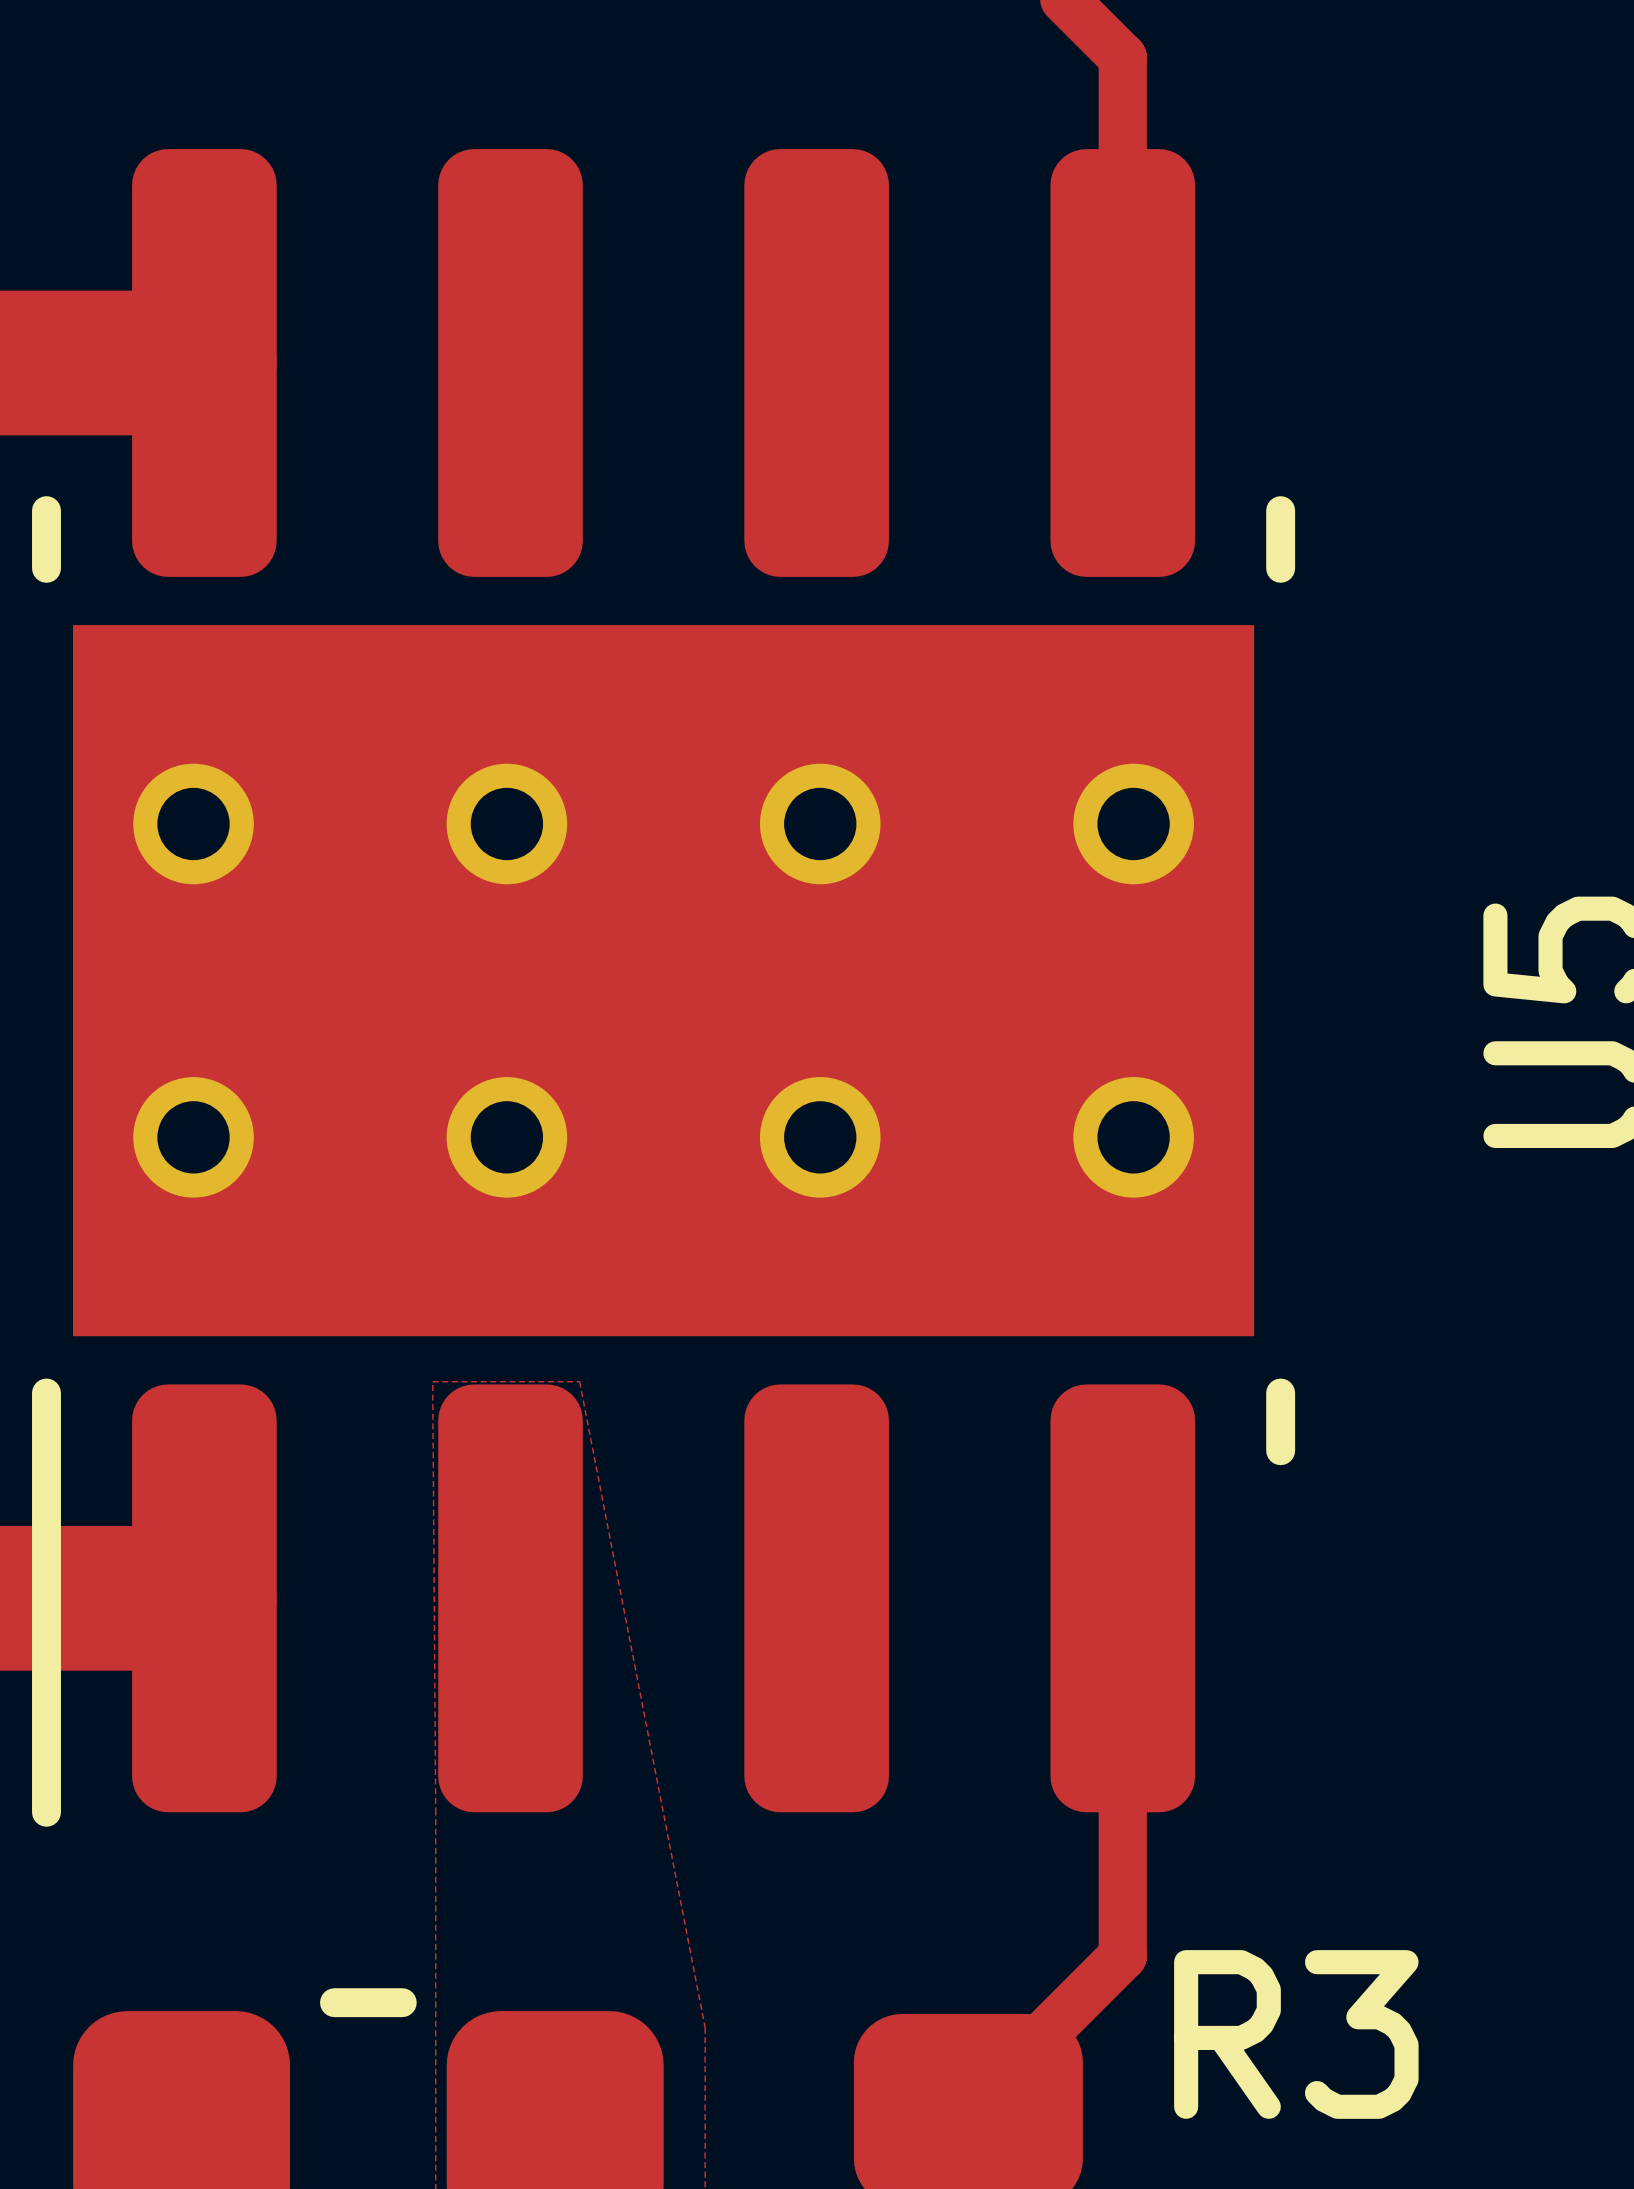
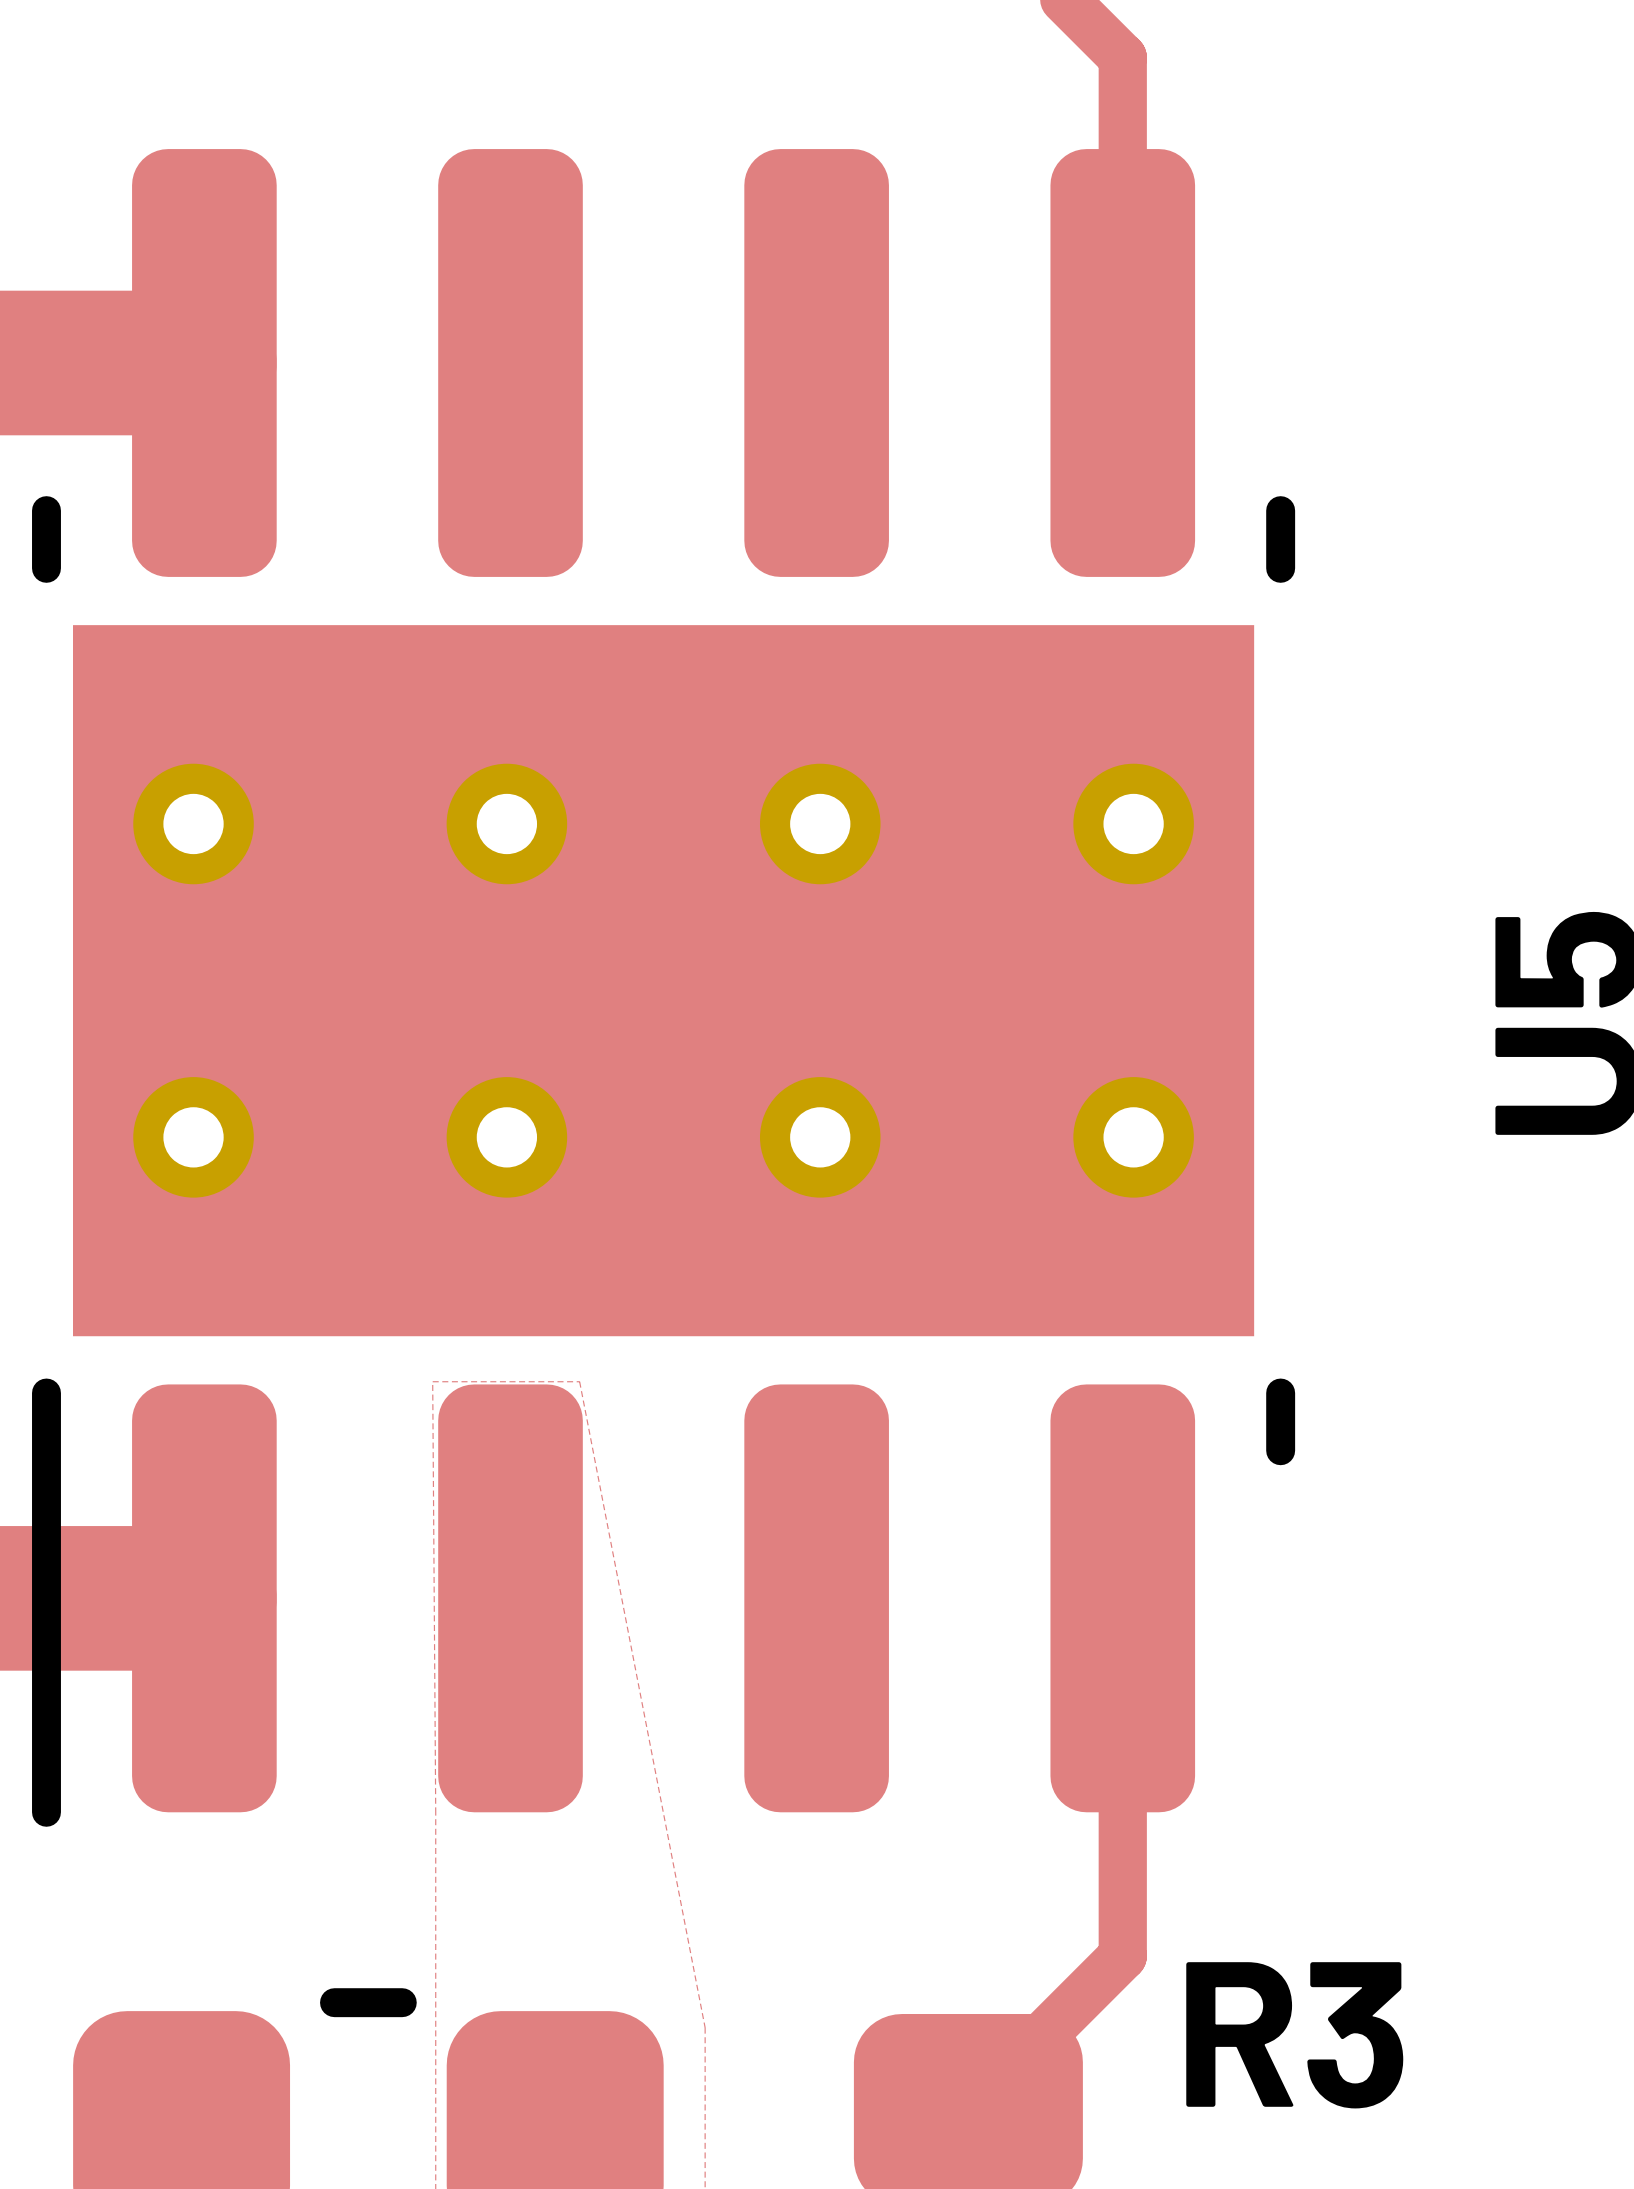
part footprint: [32, 149, 1296, 1827] -> [32, 149, 1296, 1827]

